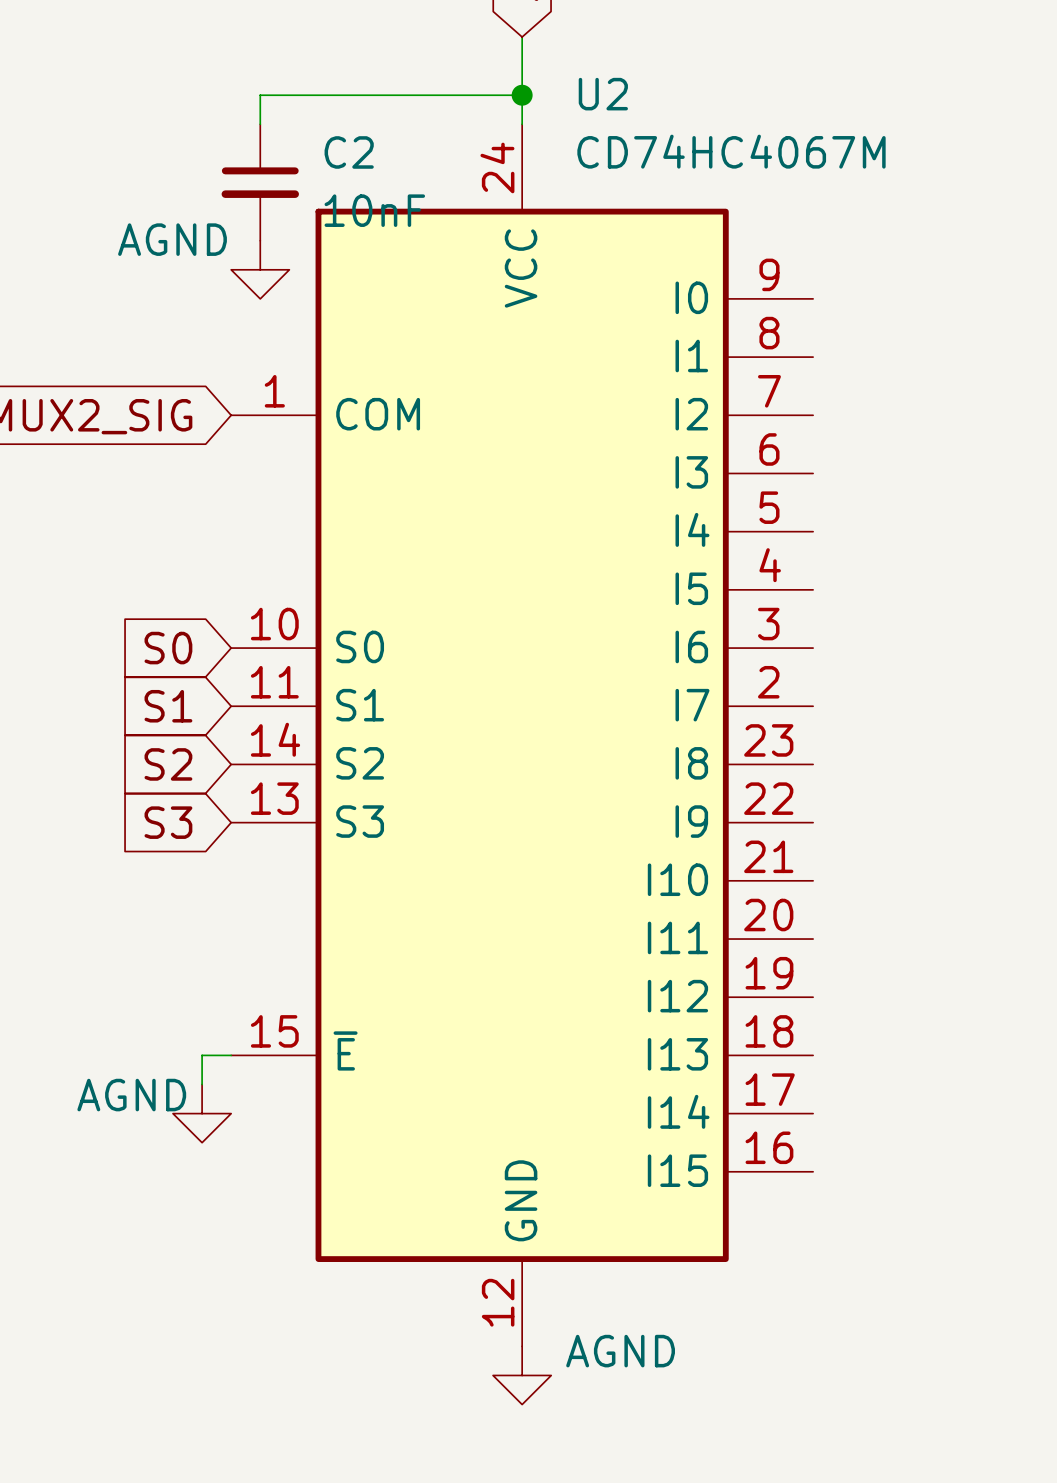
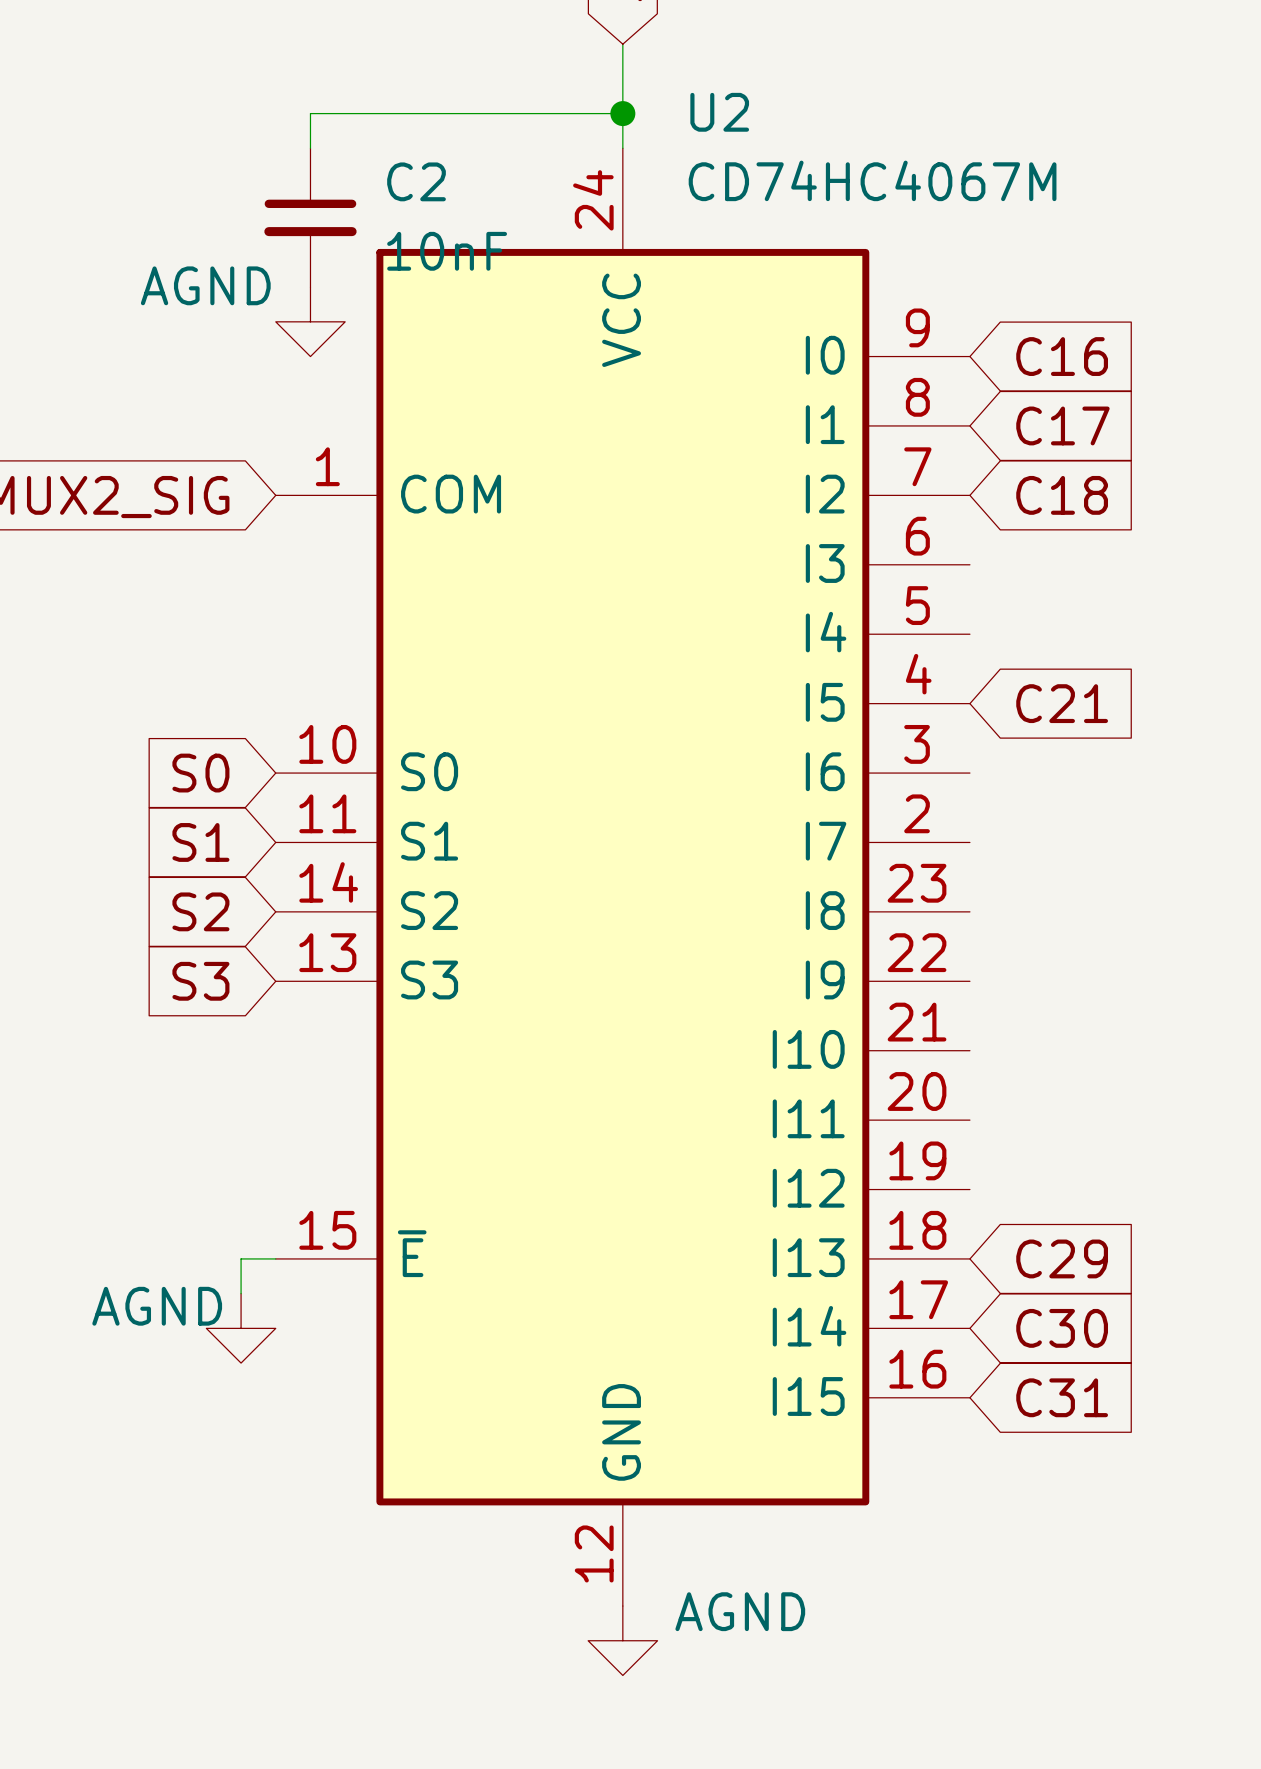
global label: none -> C16 (1062, 356)
global label: none -> C17 (1062, 425)
global label: none -> C18 (1062, 495)
global label: none -> C21 (1062, 703)
global label: none -> C29 (1062, 1258)
global label: none -> C30 (1062, 1328)
global label: none -> C31 (1062, 1397)

